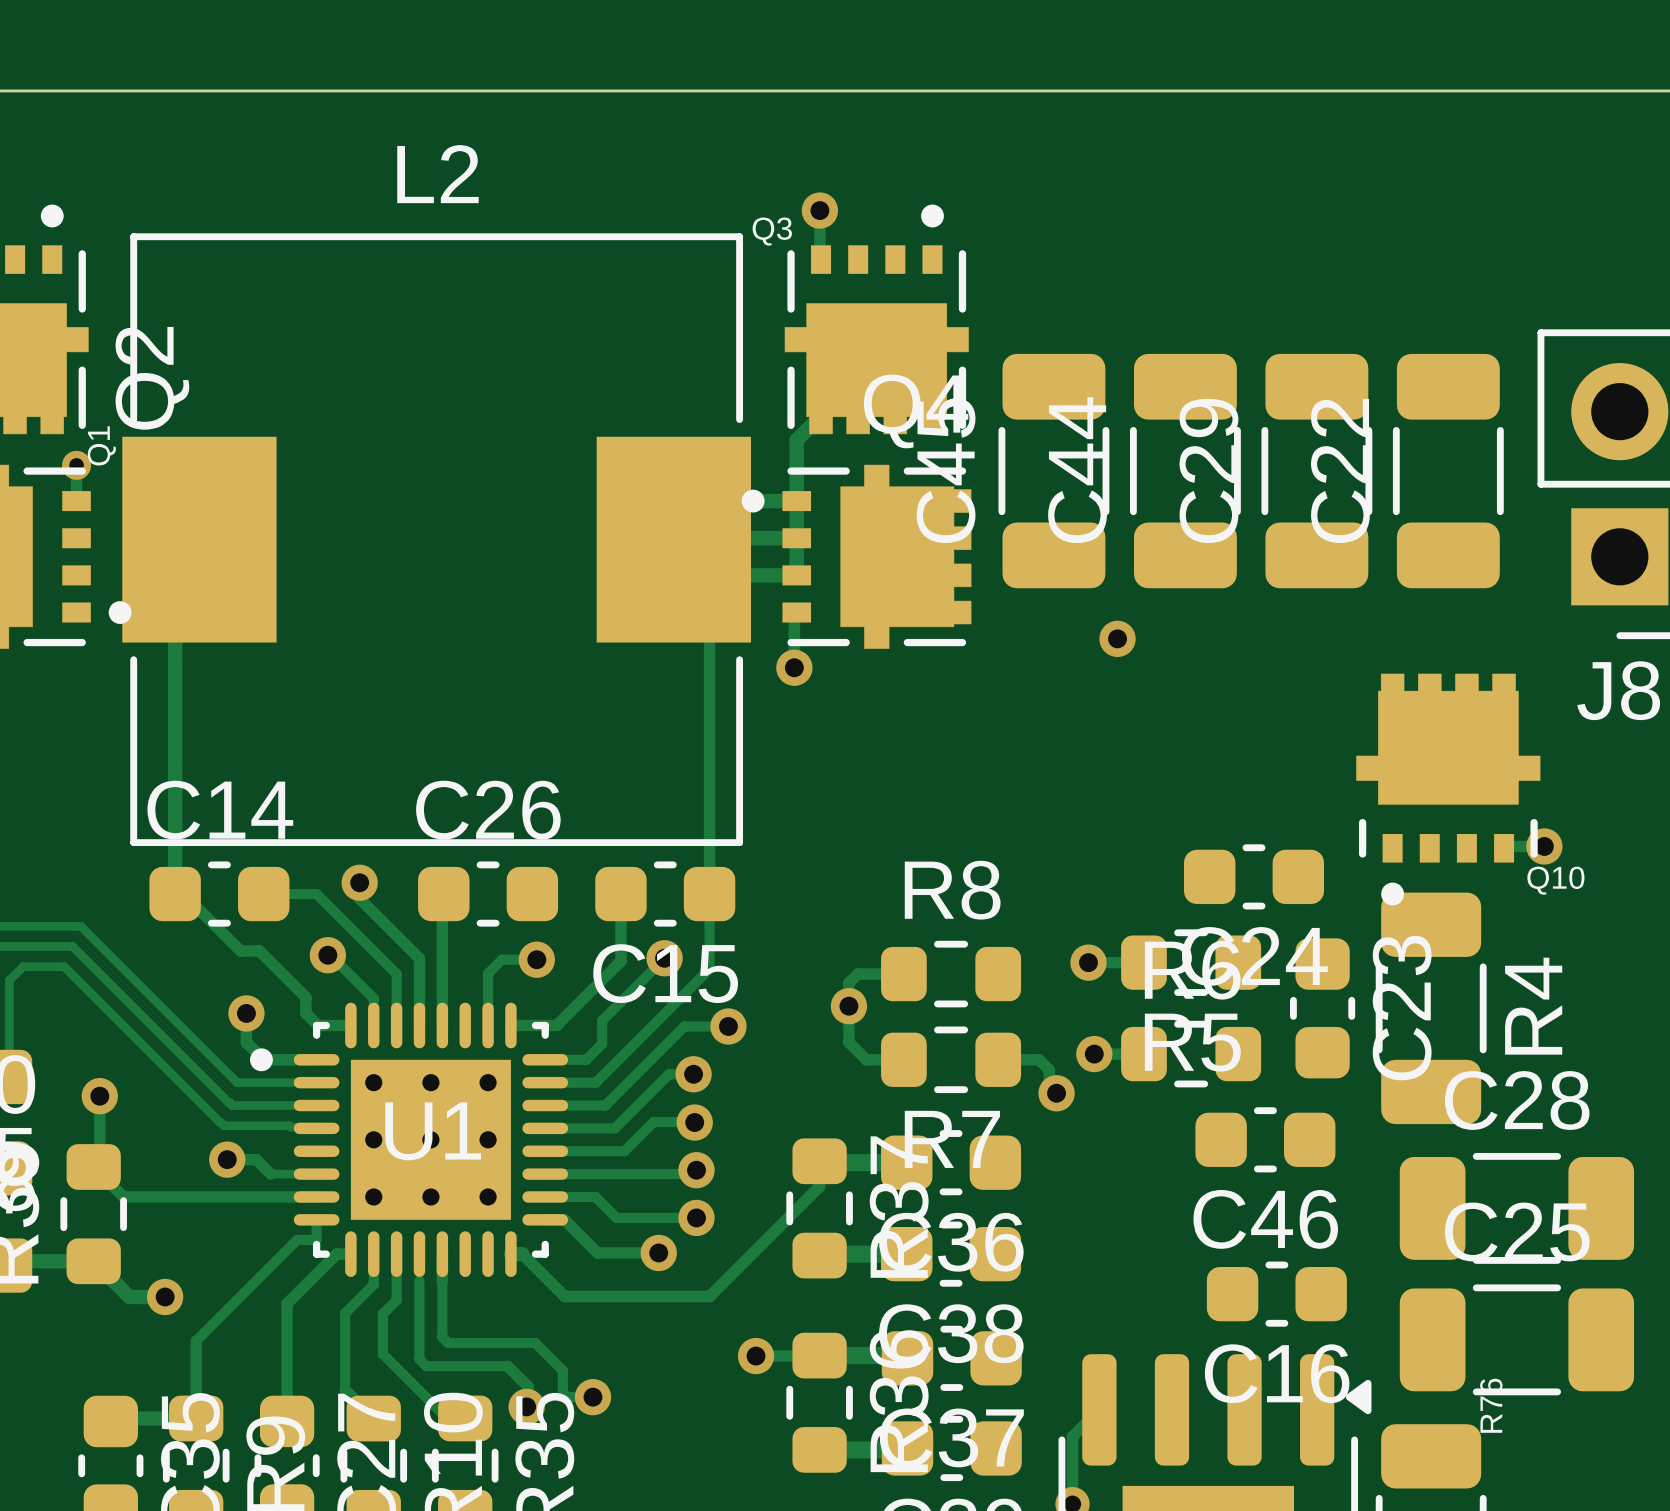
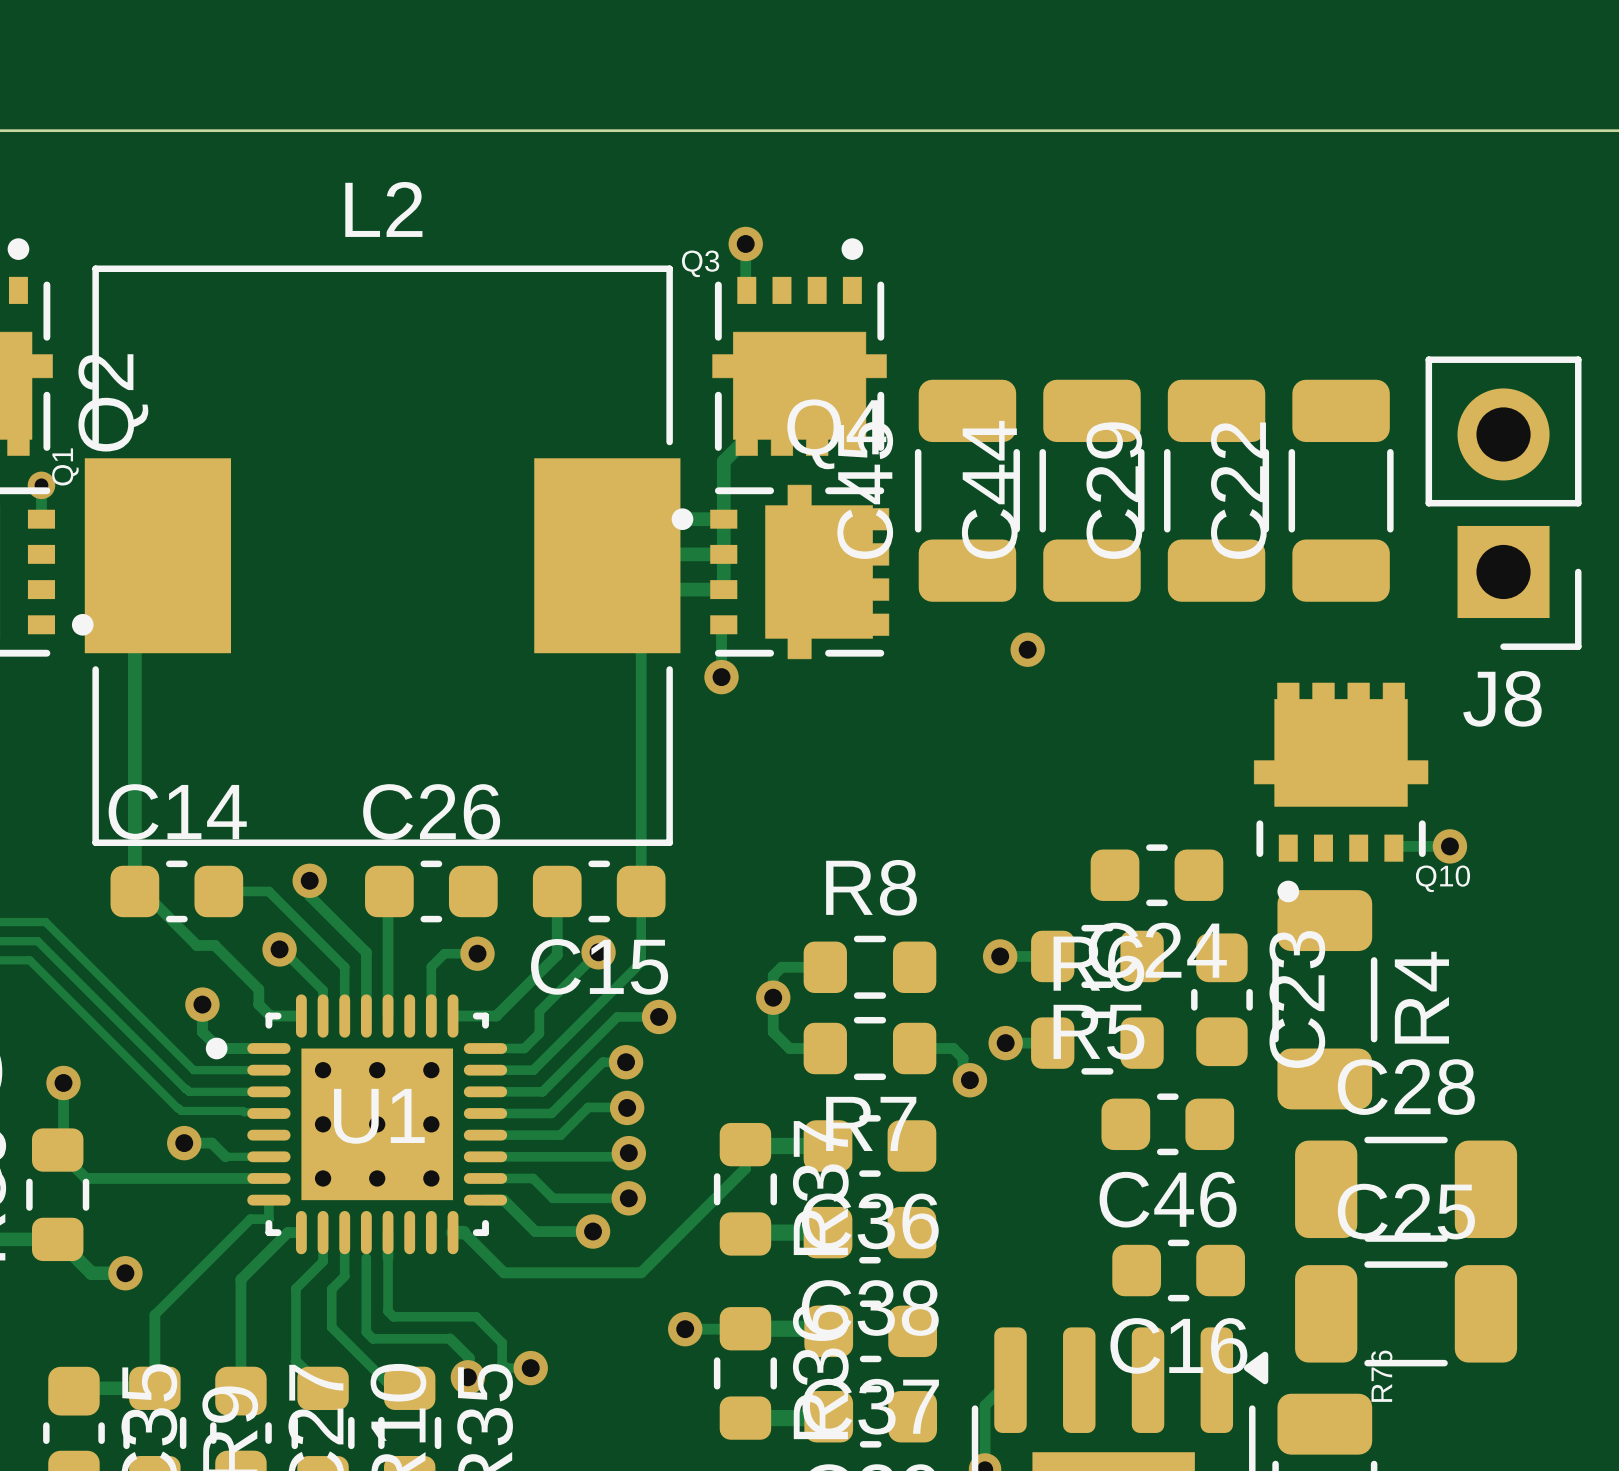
via position: (1544, 846) -> (1449, 846)

